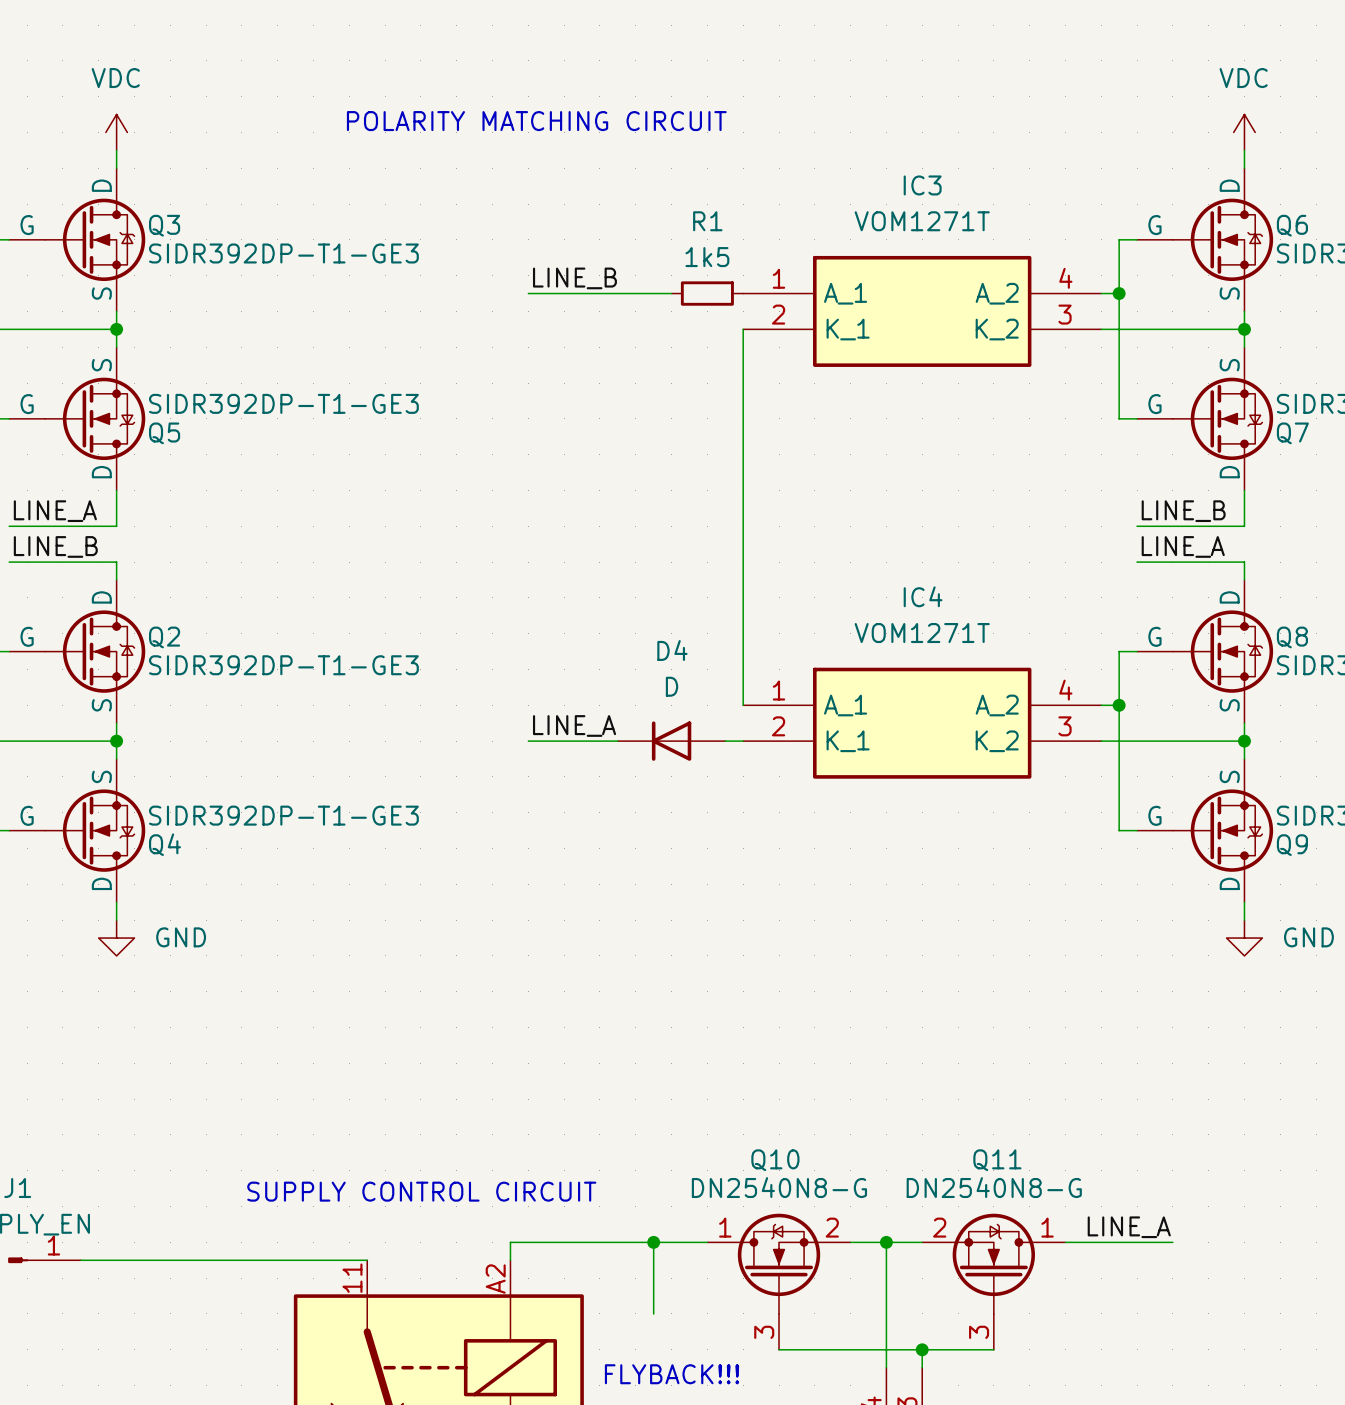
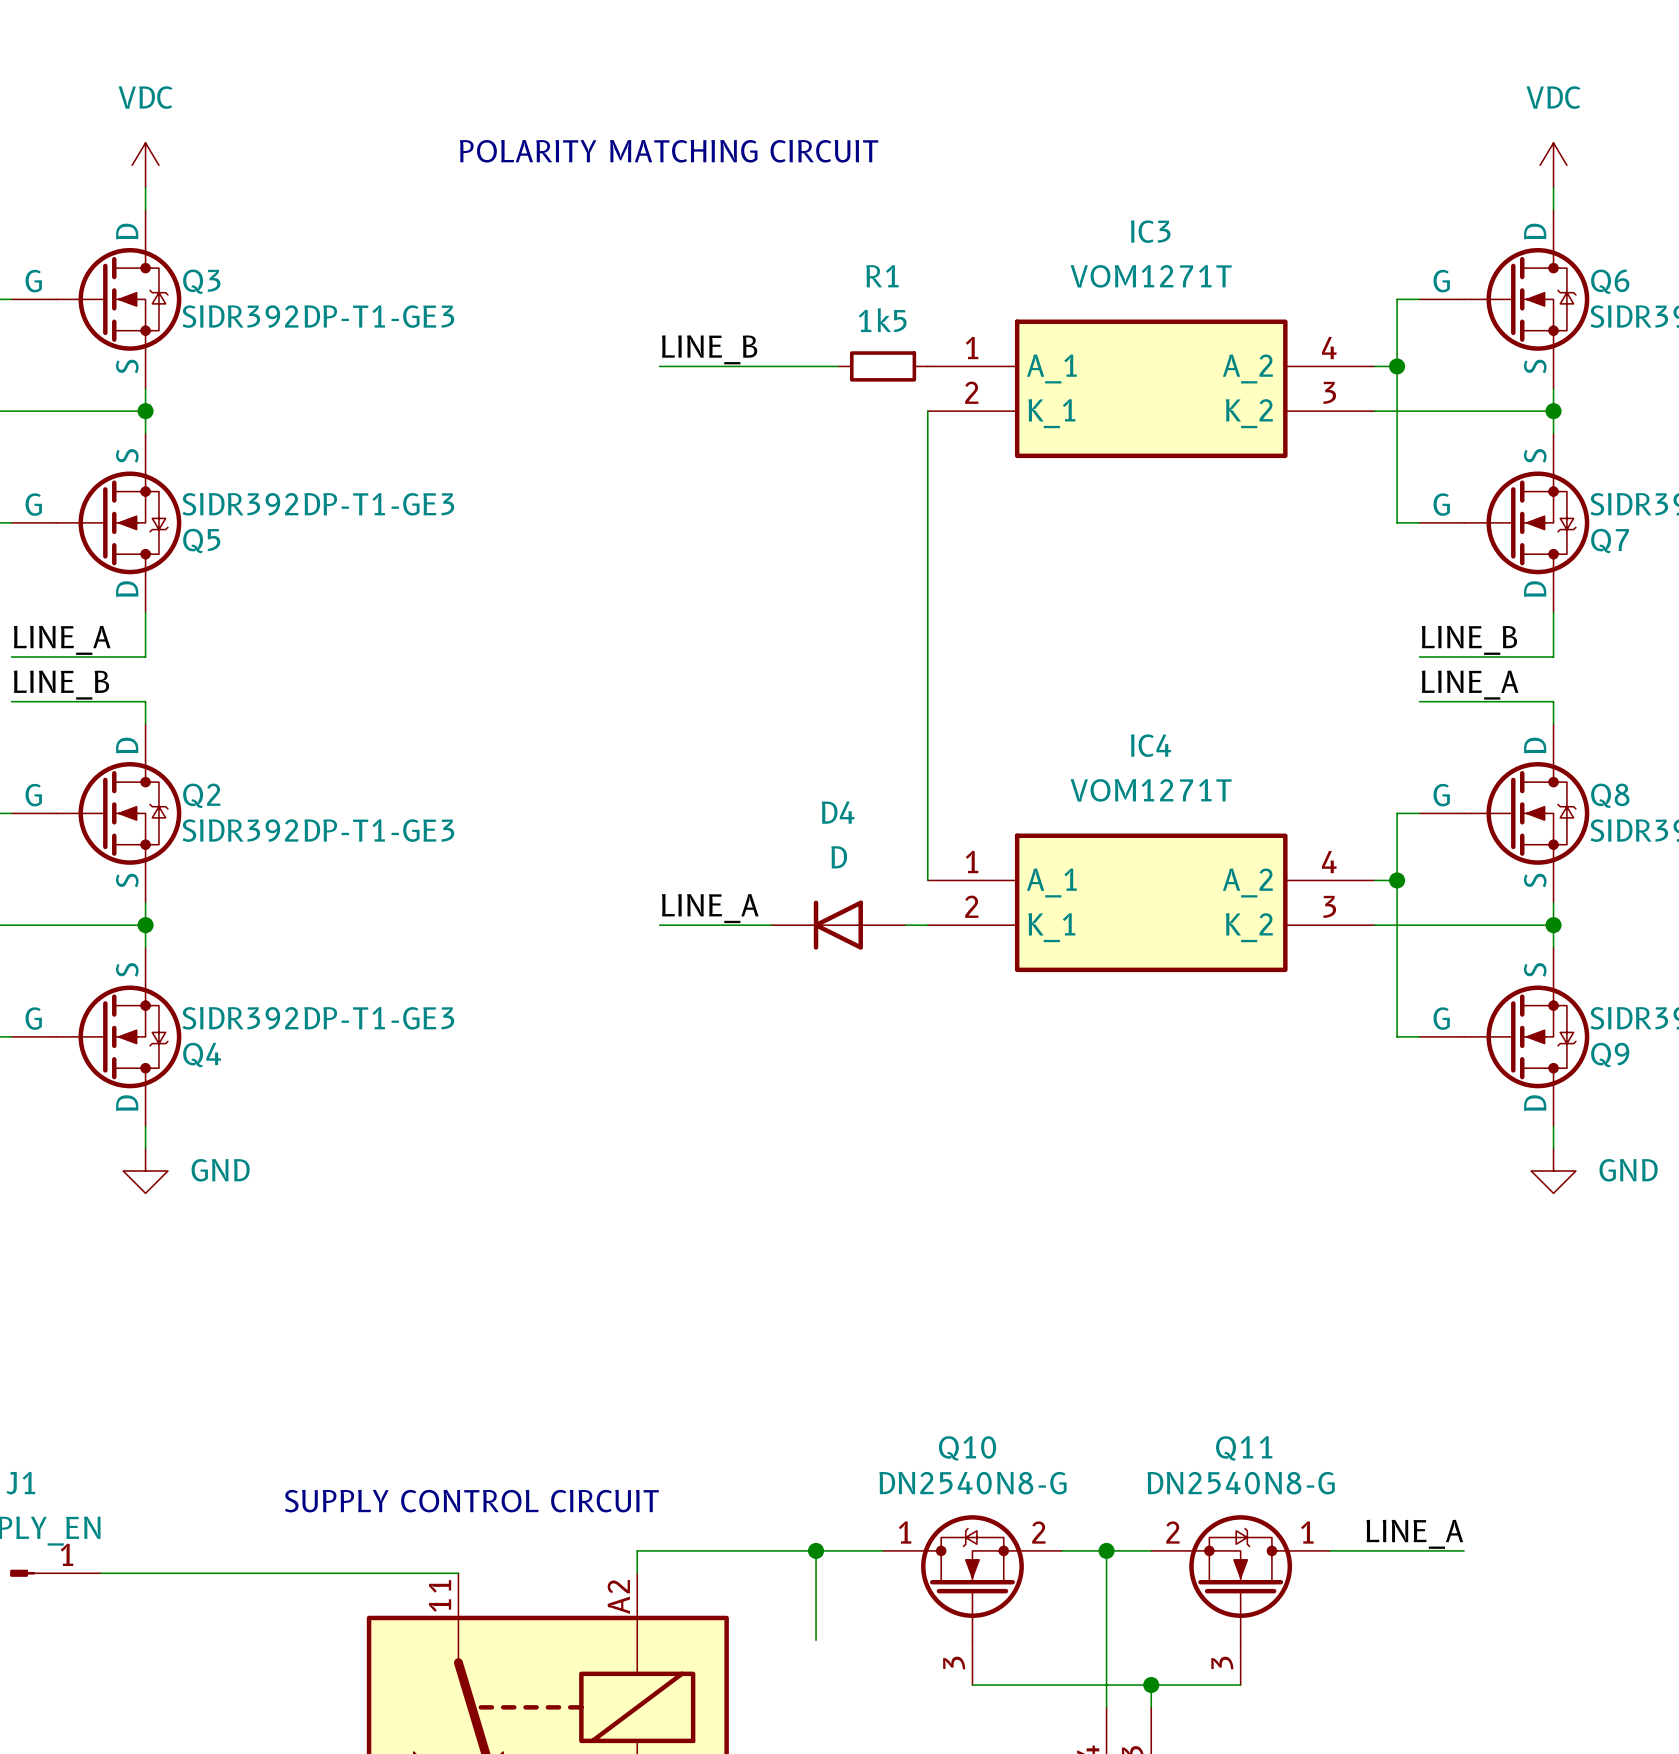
text position: SUPPLY CONTROL CIRCUIT (421, 1191) -> SUPPLY CONTROL CIRCUIT (471, 1501)
text: FLYBACK!!! (672, 1374) -> none

